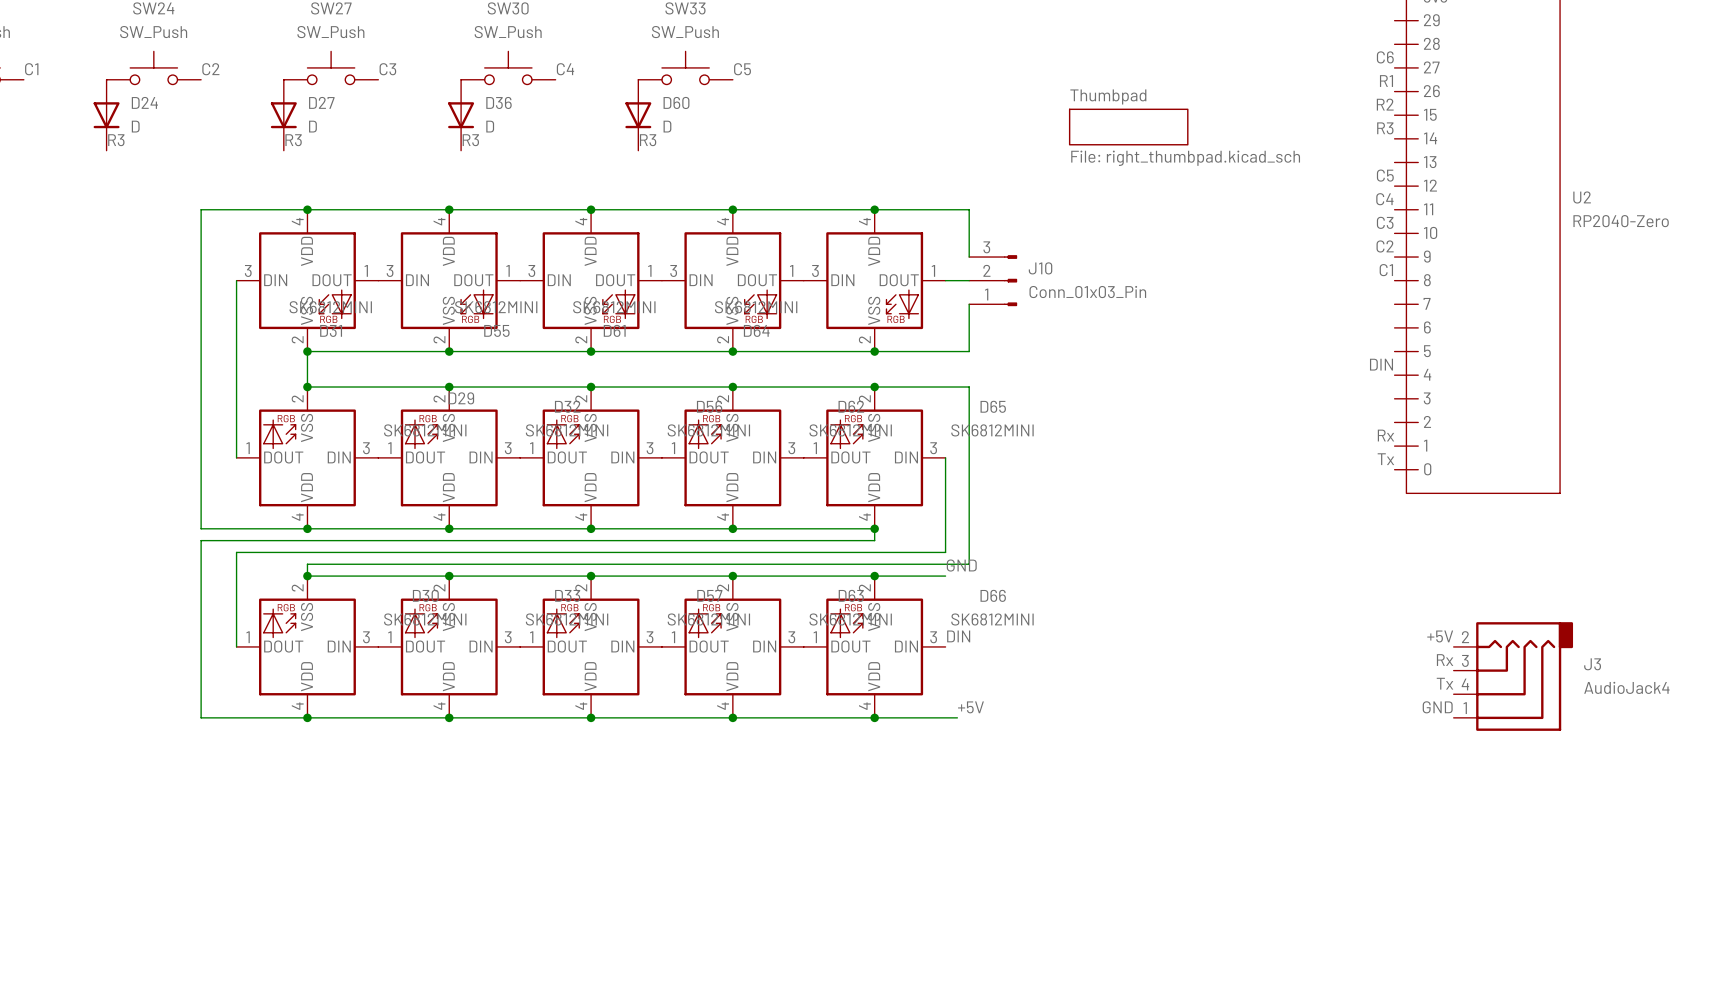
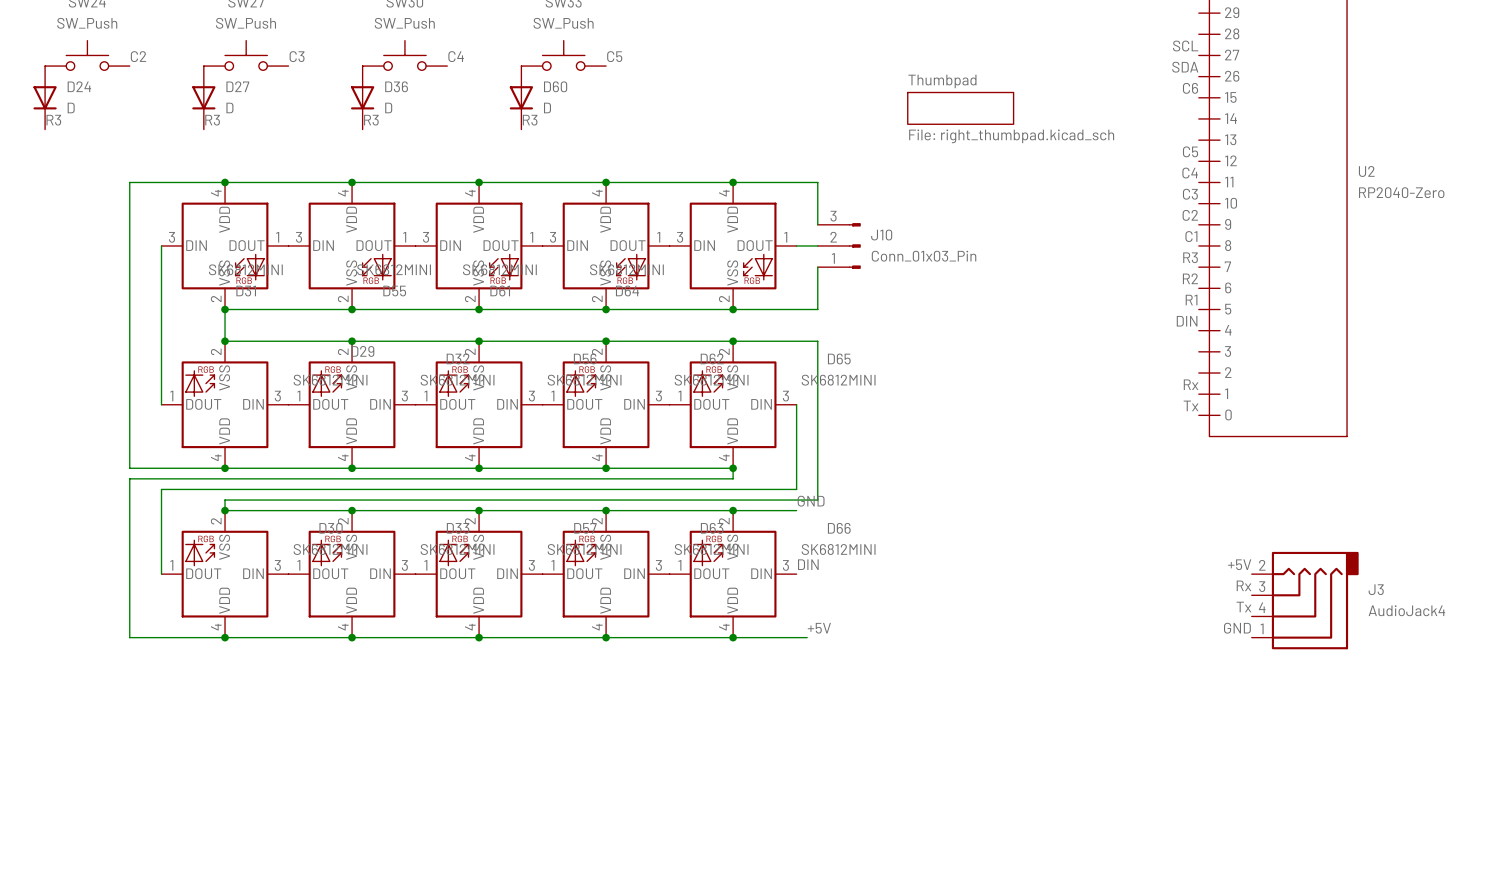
label: C6 (1385, 57) -> SCL (1185, 46)
label: R1 (1386, 81) -> SDA (1185, 67)
label: R2 (1385, 104) -> C6 (1190, 88)
label position: R3 (1385, 128) -> R3 (1190, 257)
label: none -> R2 (1190, 278)
label: none -> R1 (1191, 300)

